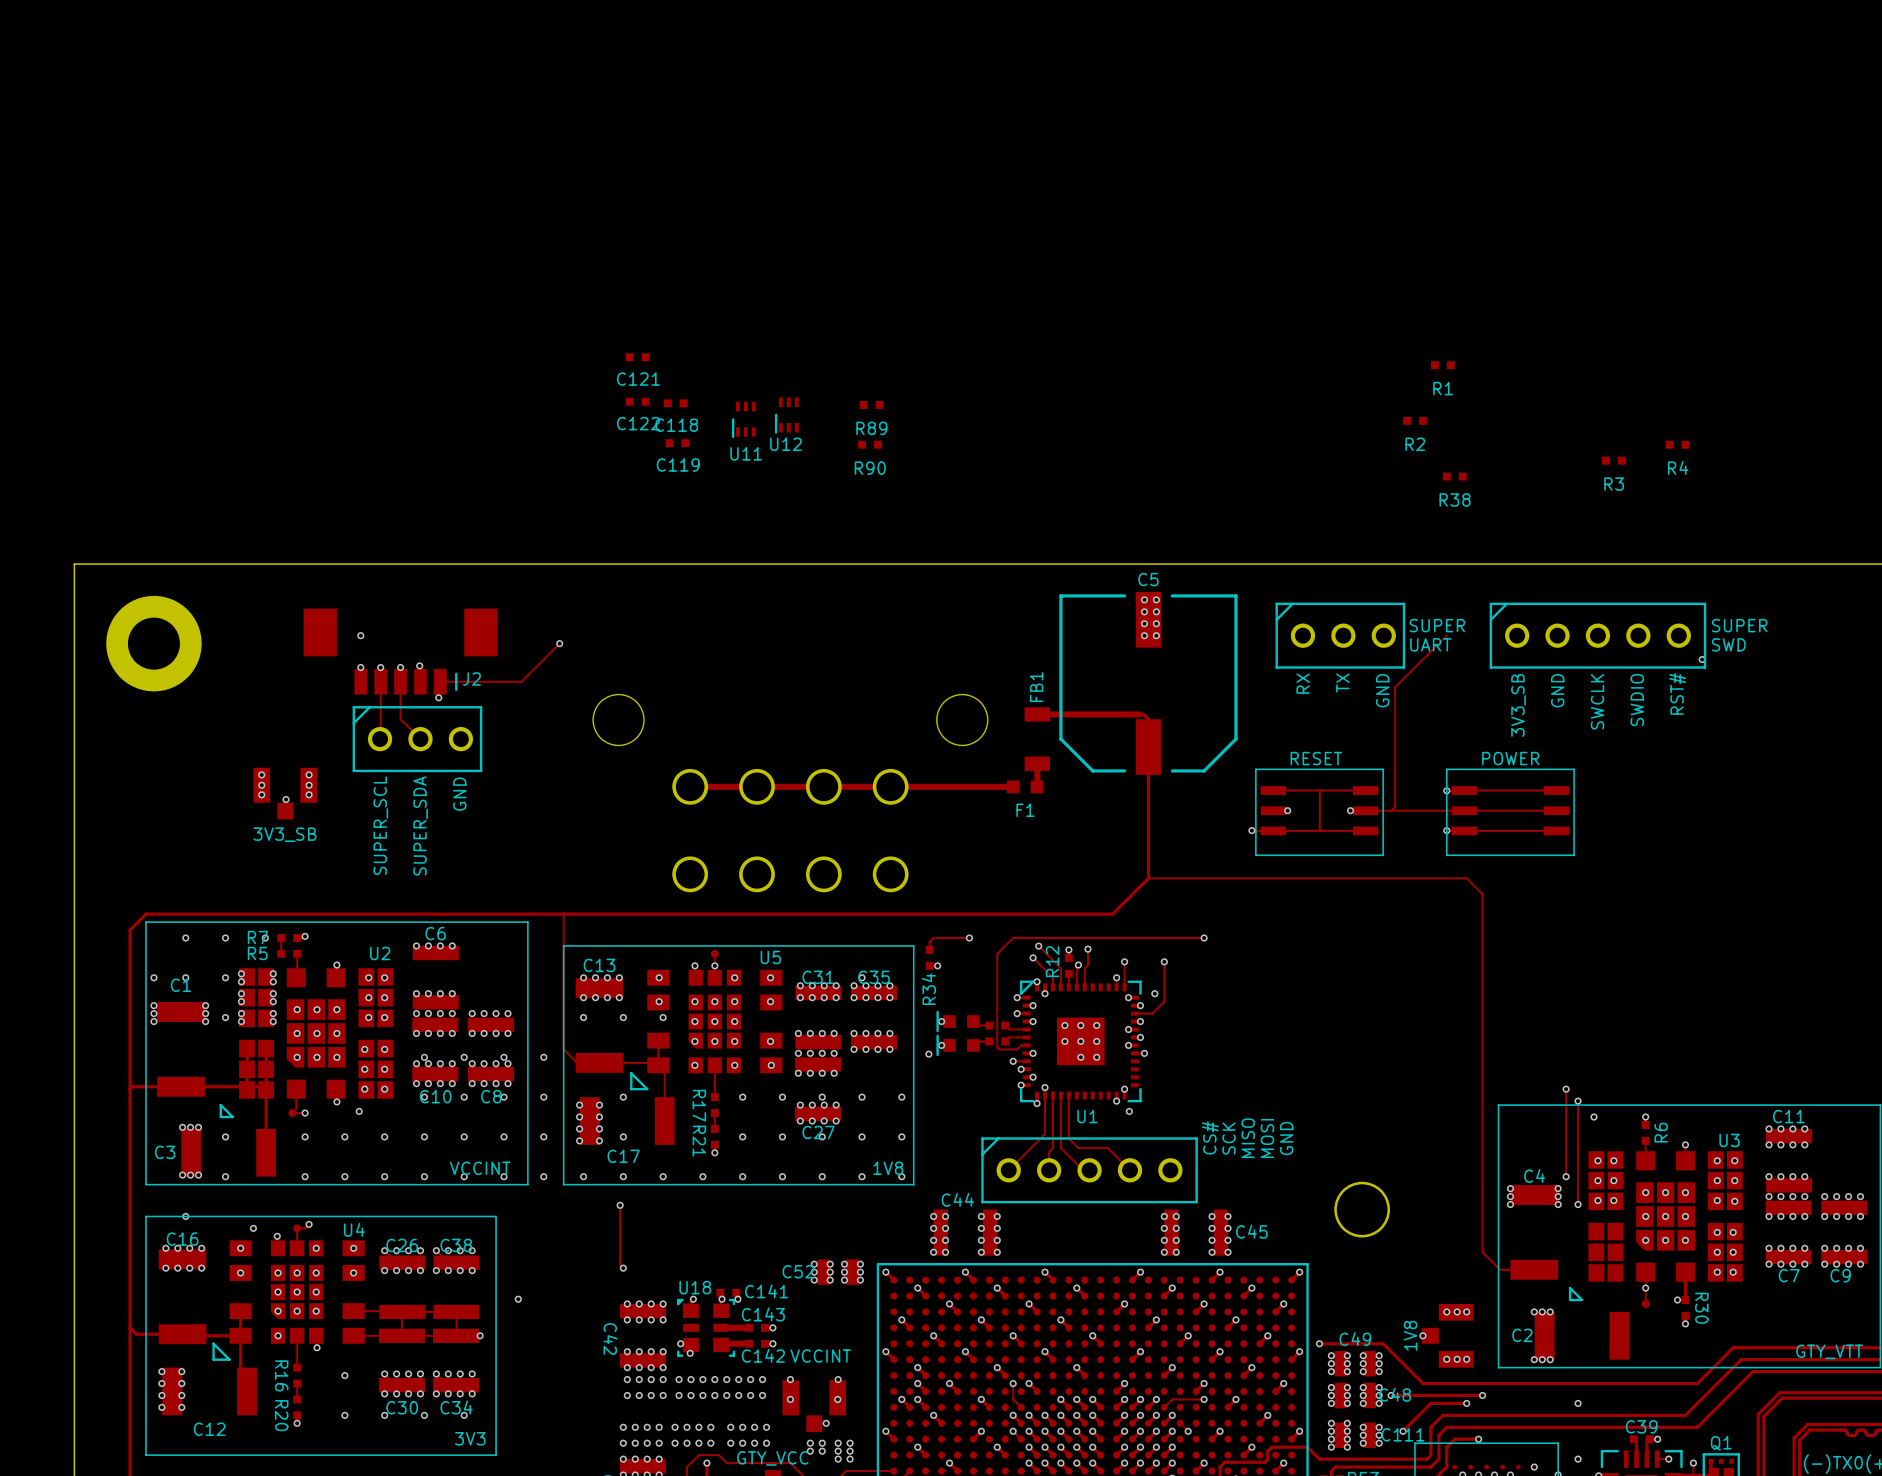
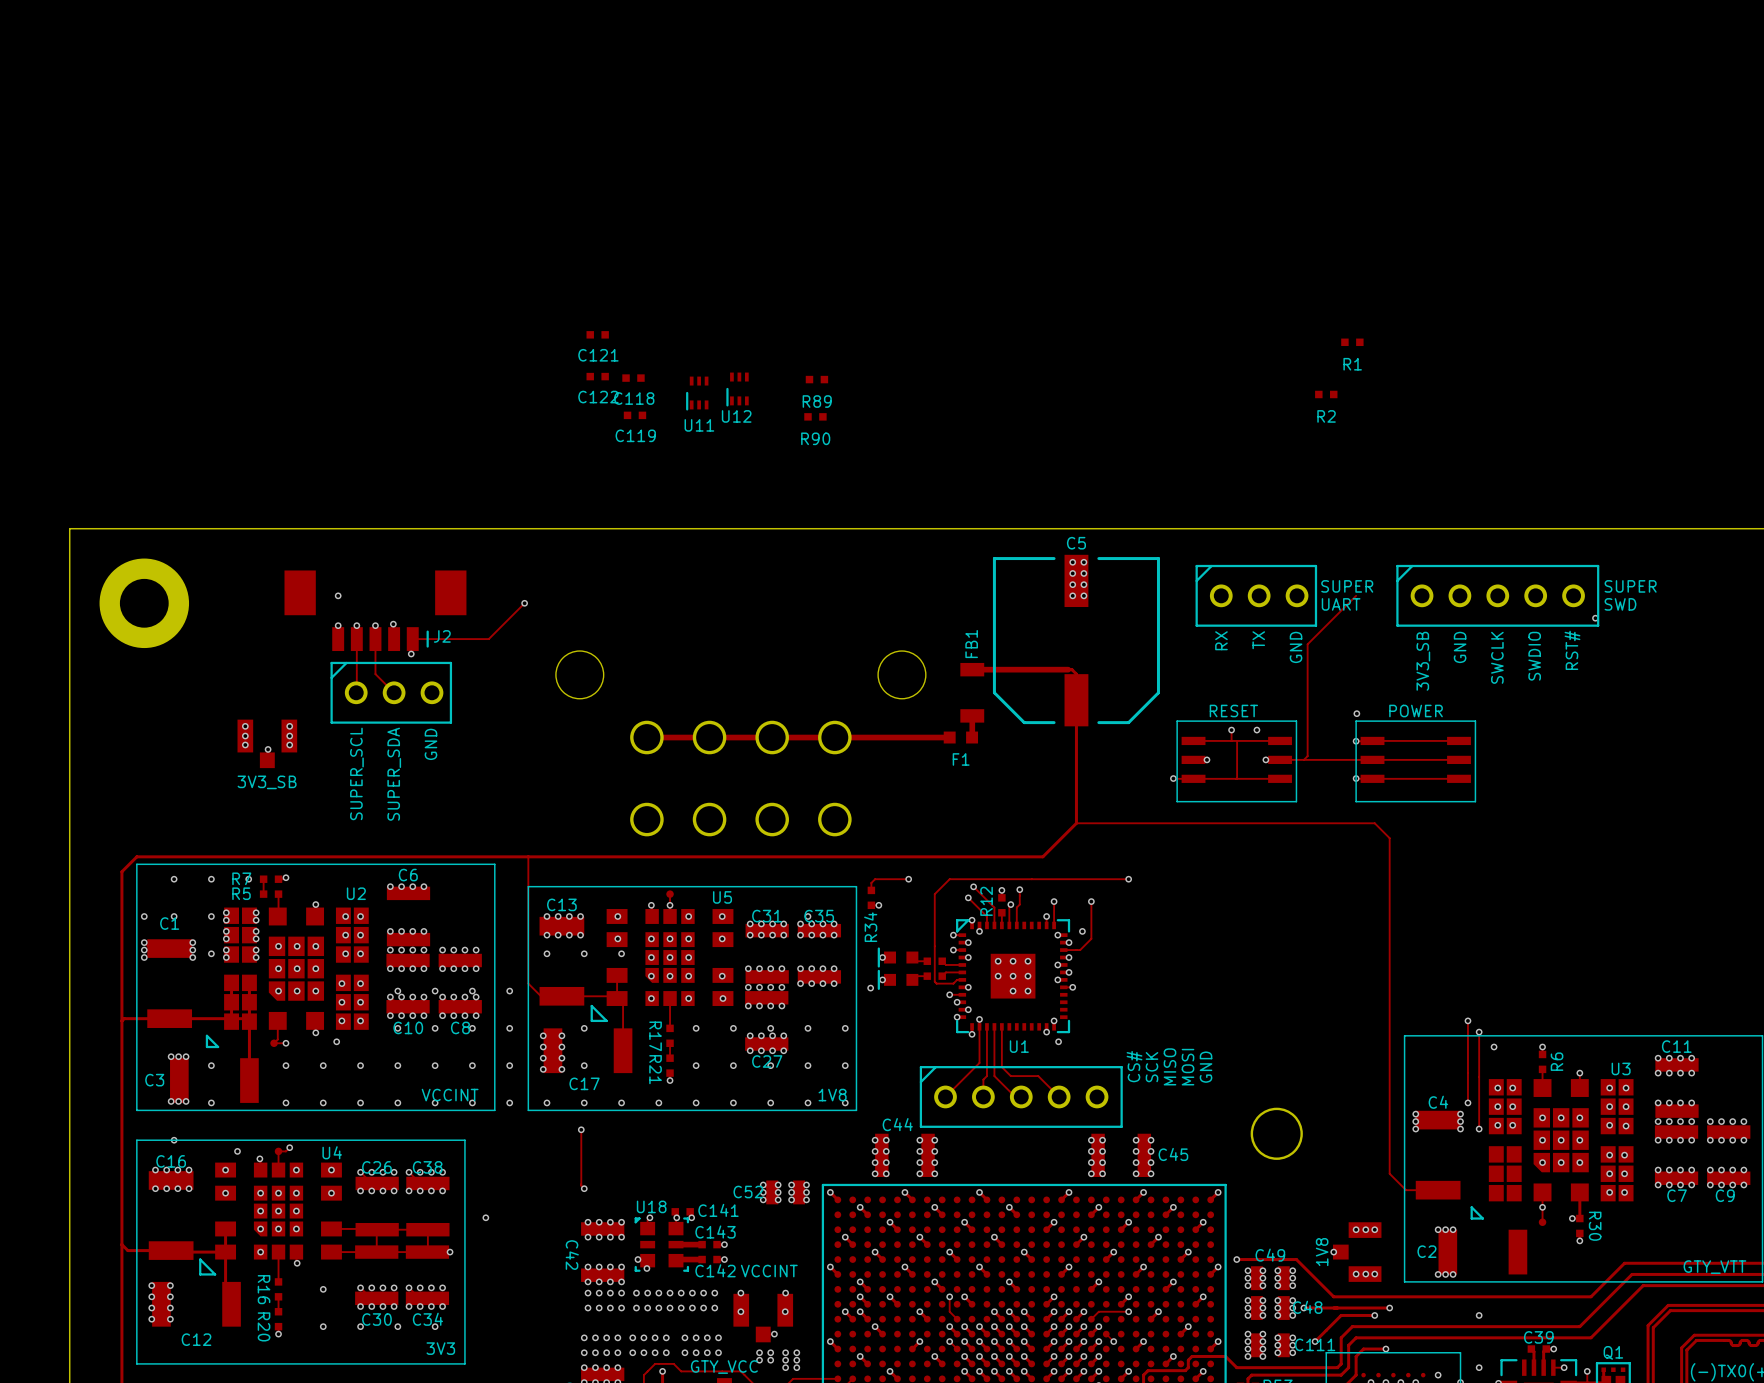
R4: (1677, 444) -> none
R3: (1613, 460) -> none
R38: (1454, 476) -> none
via: none -> (1356, 713)
track: none -> (1231, 730) (1231, 740)
via: none -> (1231, 730)
via: none -> (1256, 730)

